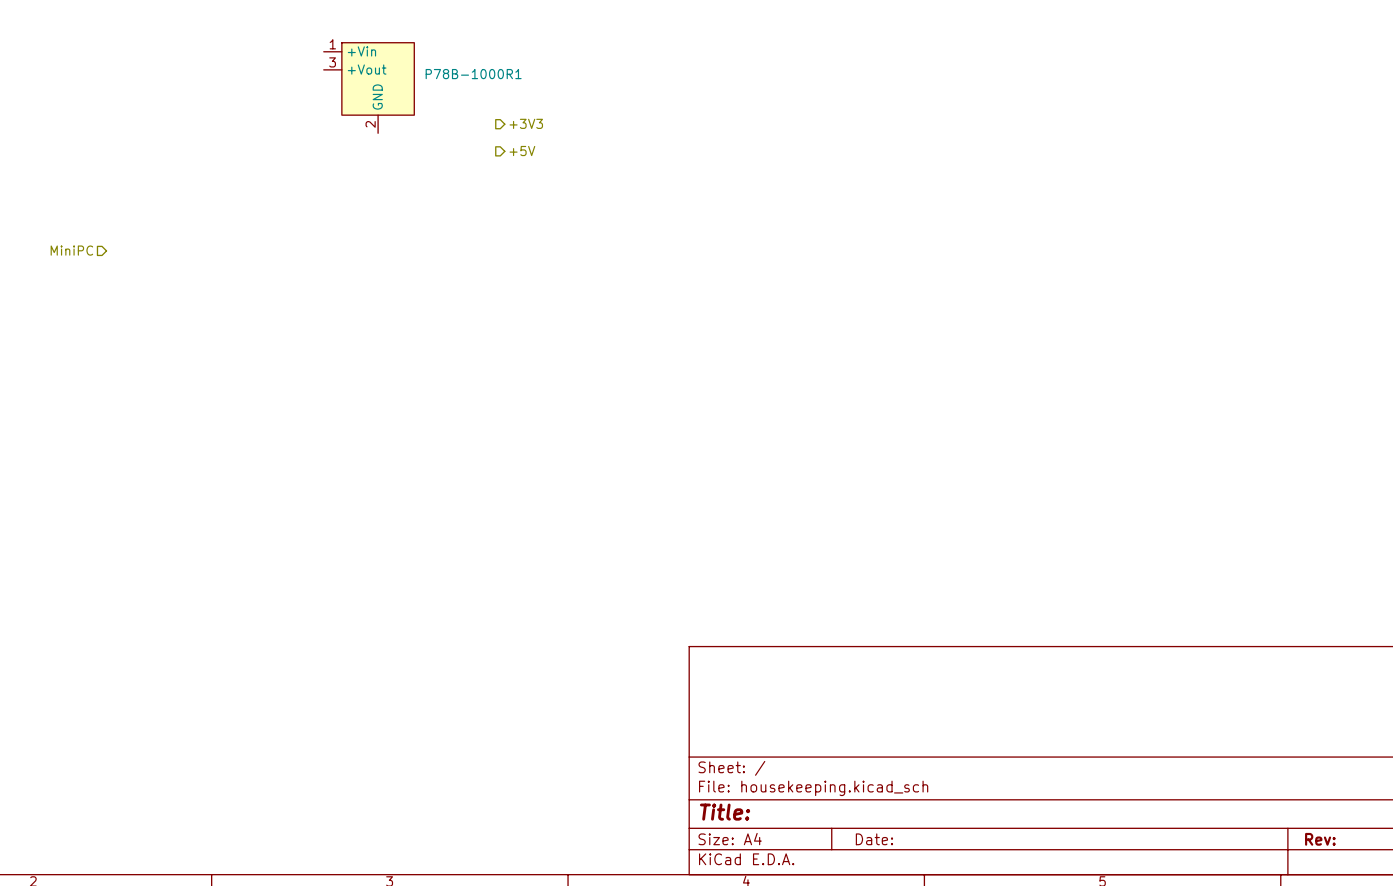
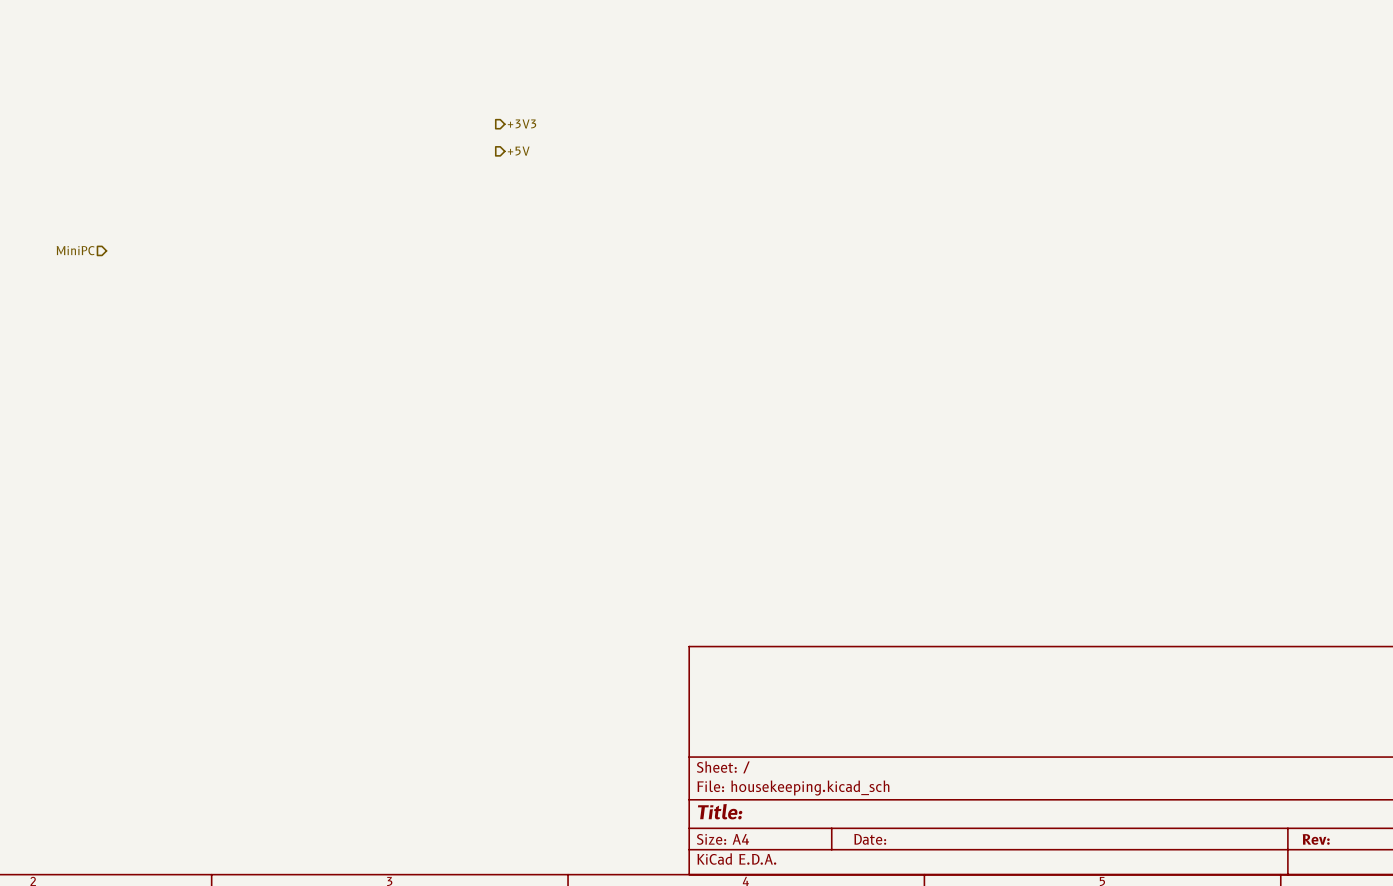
P78B-1000R1: (369, 87) -> none

